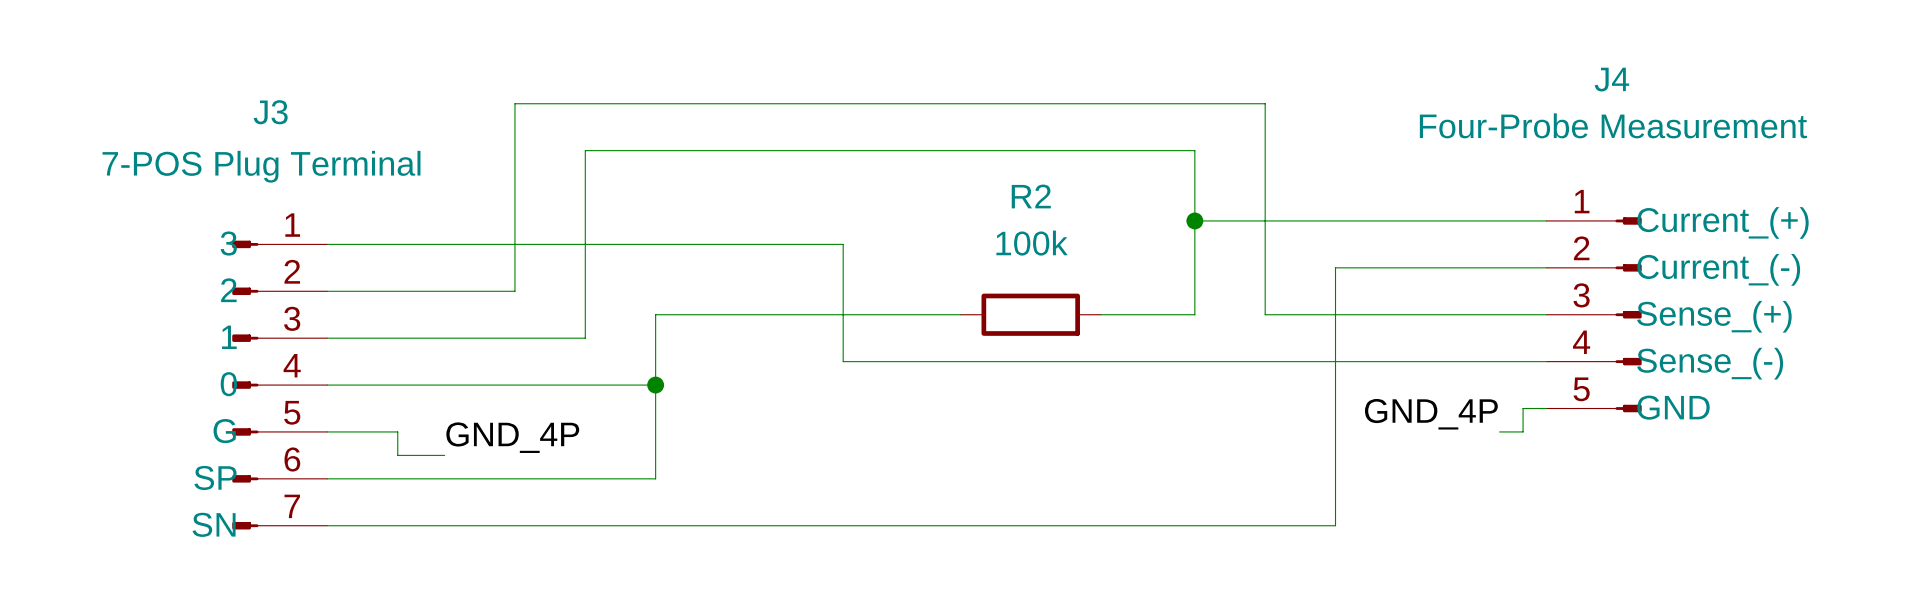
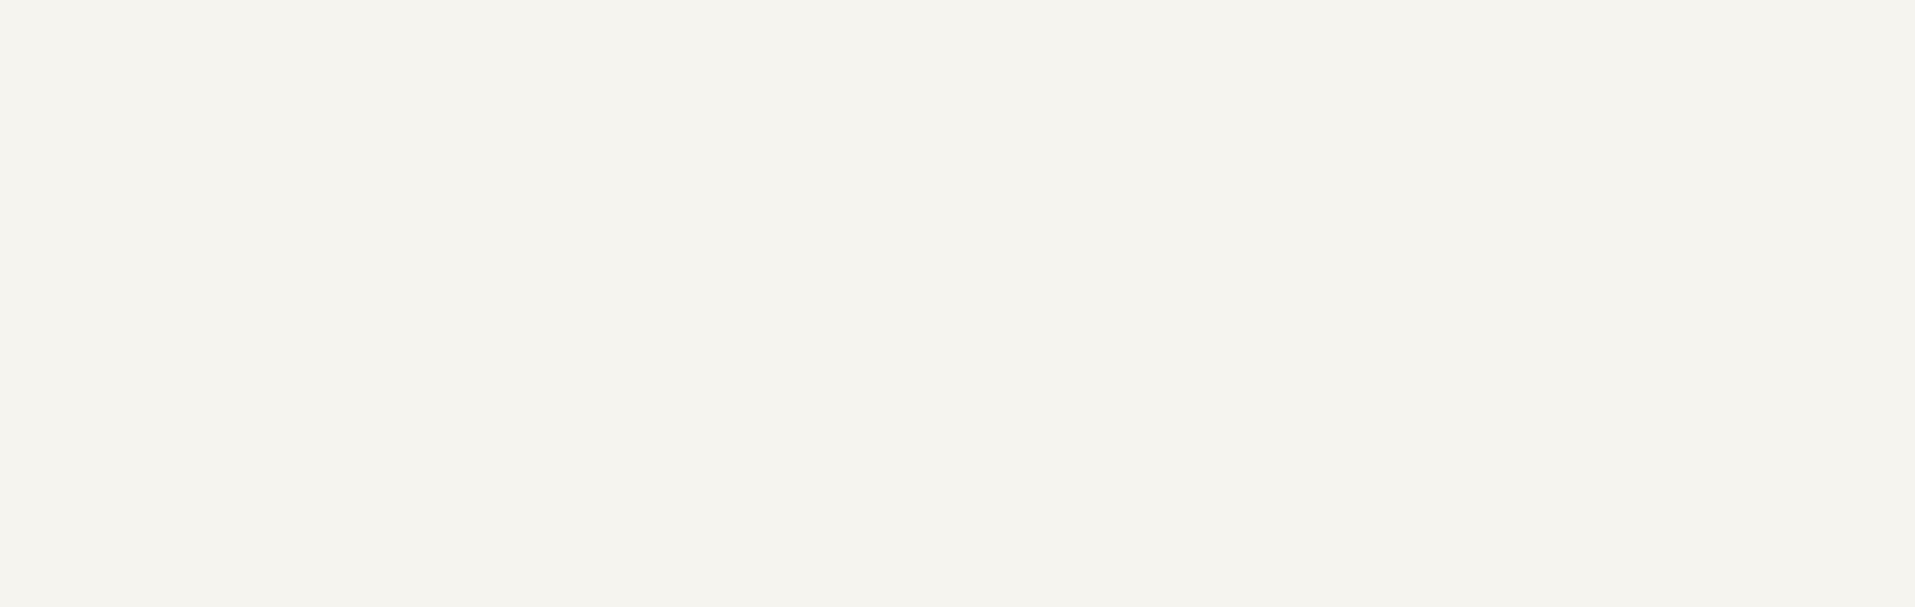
wire: (1194, 220) (1546, 220) -> none
junction: (1194, 220) -> none
wire: (327, 244) (843, 244) (843, 361) (1546, 361) -> none
wire: (1546, 267) (1335, 267) (1335, 525) (327, 525) -> none
wire: (327, 291) (514, 291) (514, 103) (1265, 103) (1265, 314) (1546, 314) -> none
wire: (960, 314) (655, 314) (655, 478) (327, 478) -> none
R2: 100k (1030, 314) -> none
wire: (1101, 314) (1194, 314) (1194, 150) (585, 150) (585, 338) (327, 338) -> none
J4: Four-Probe Measurement (1594, 314) -> none
J3: 7-POS Plug Terminal (279, 385) -> none
wire: (327, 385) (655, 385) -> none
junction: (655, 385) -> none
wire: (1546, 408) (1523, 408) (1523, 431) (1499, 431) -> none
label: GND_4P (1431, 414) -> none
wire: (327, 431) (397, 431) (397, 455) (444, 455) -> none
label: GND_4P (512, 437) -> none

